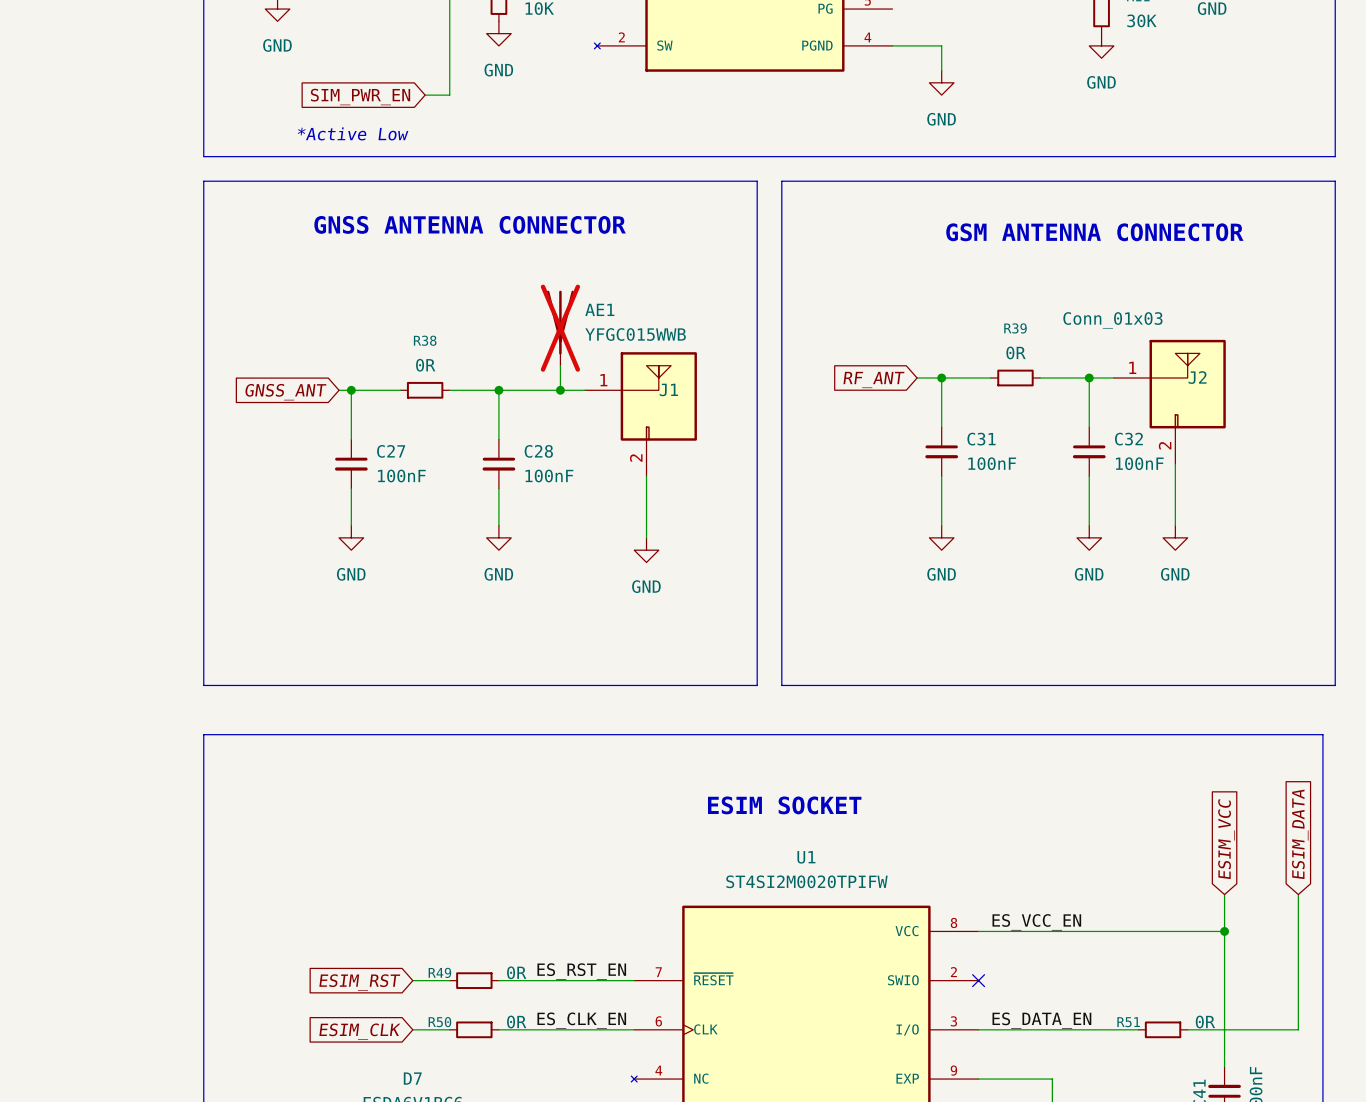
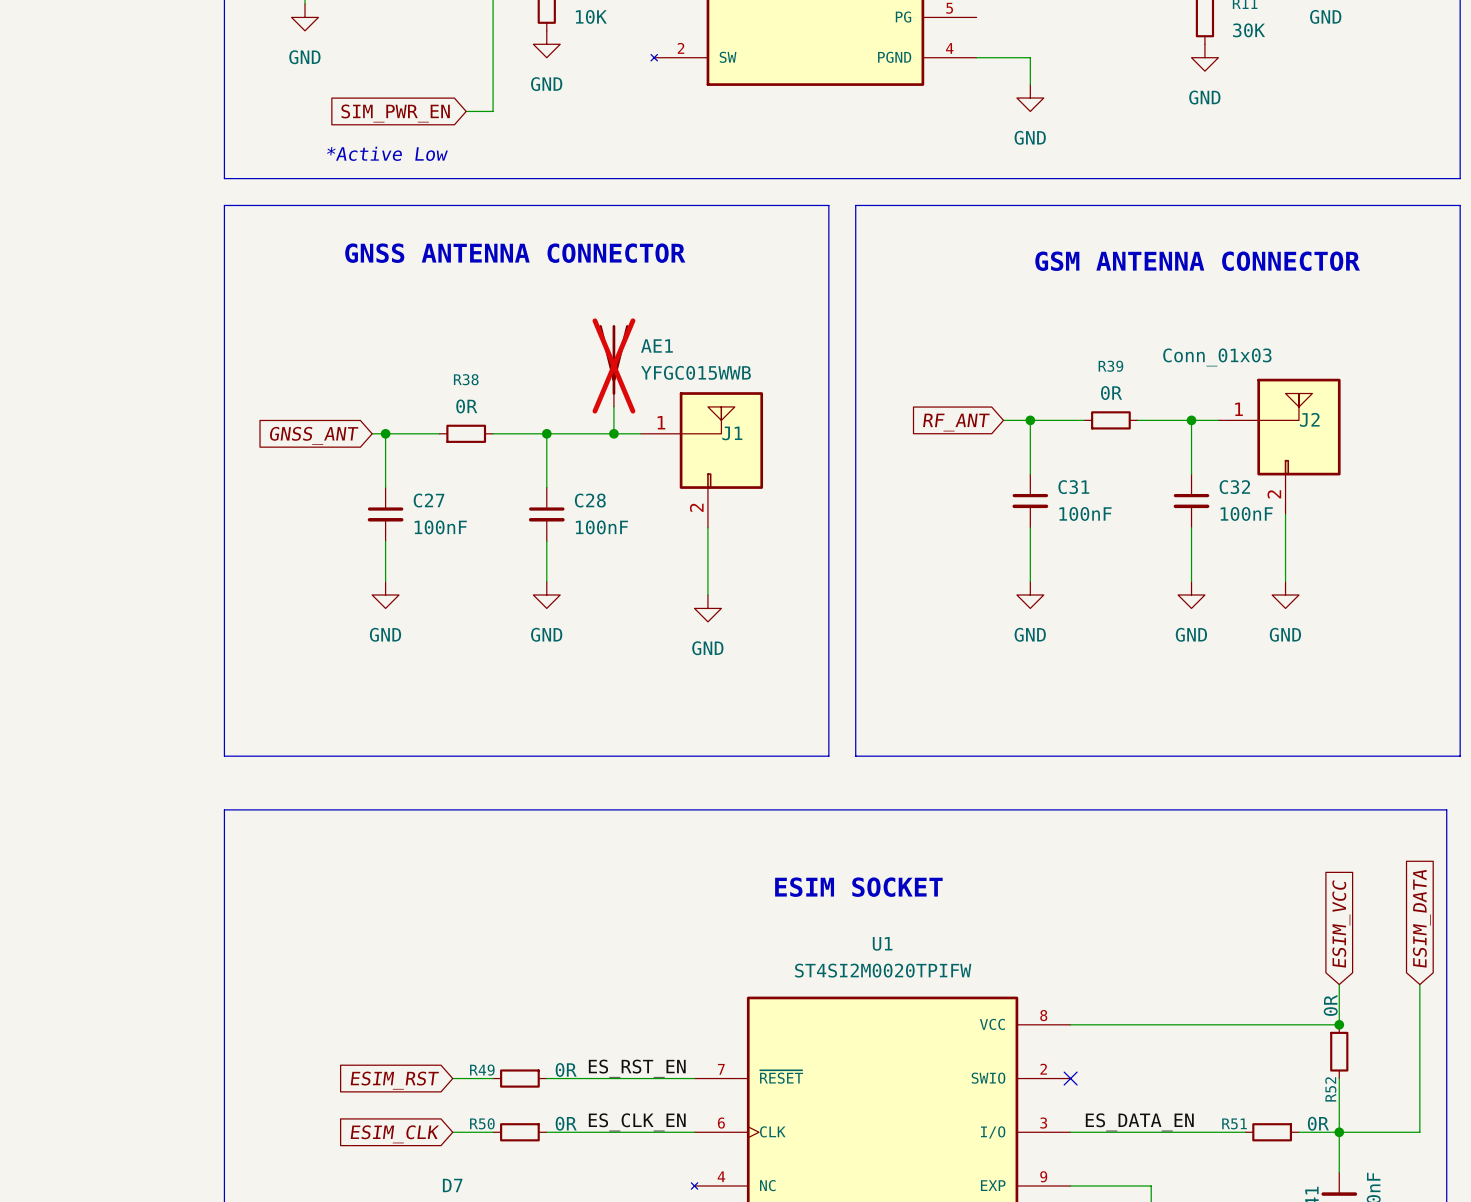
label: ES_VCC_EN (1036, 922) -> none
wire: (1224, 931) (1224, 980) -> none
R52: none -> 0R (1339, 1051)
junction: none -> (1339, 1132)

